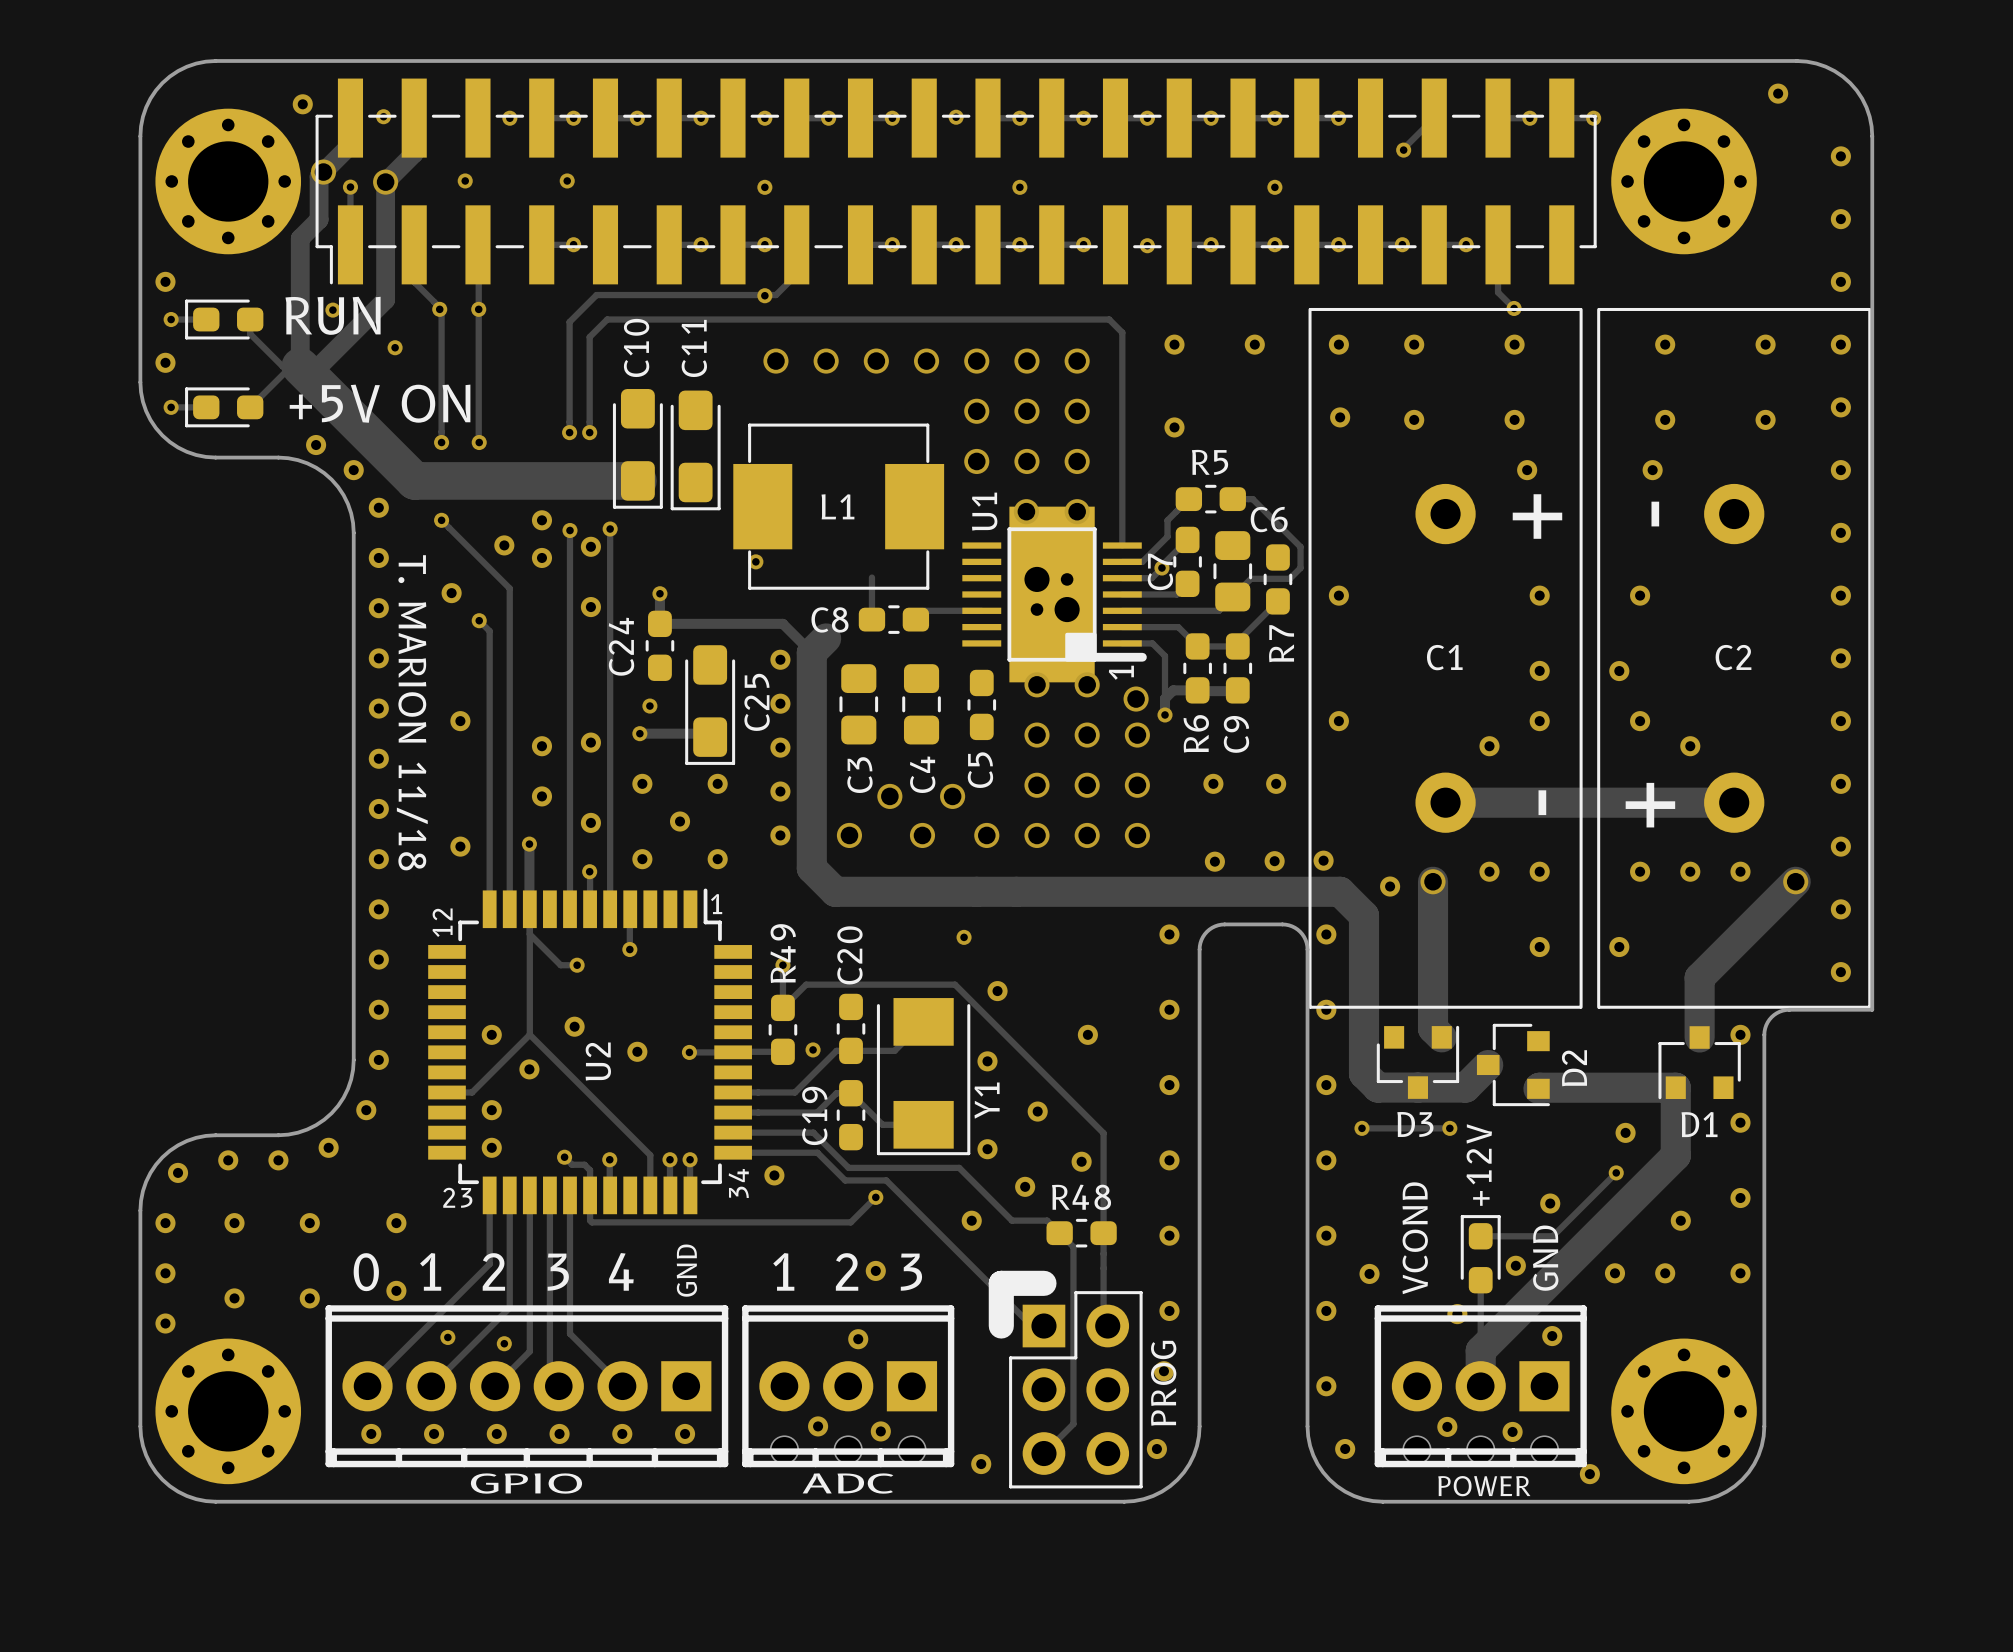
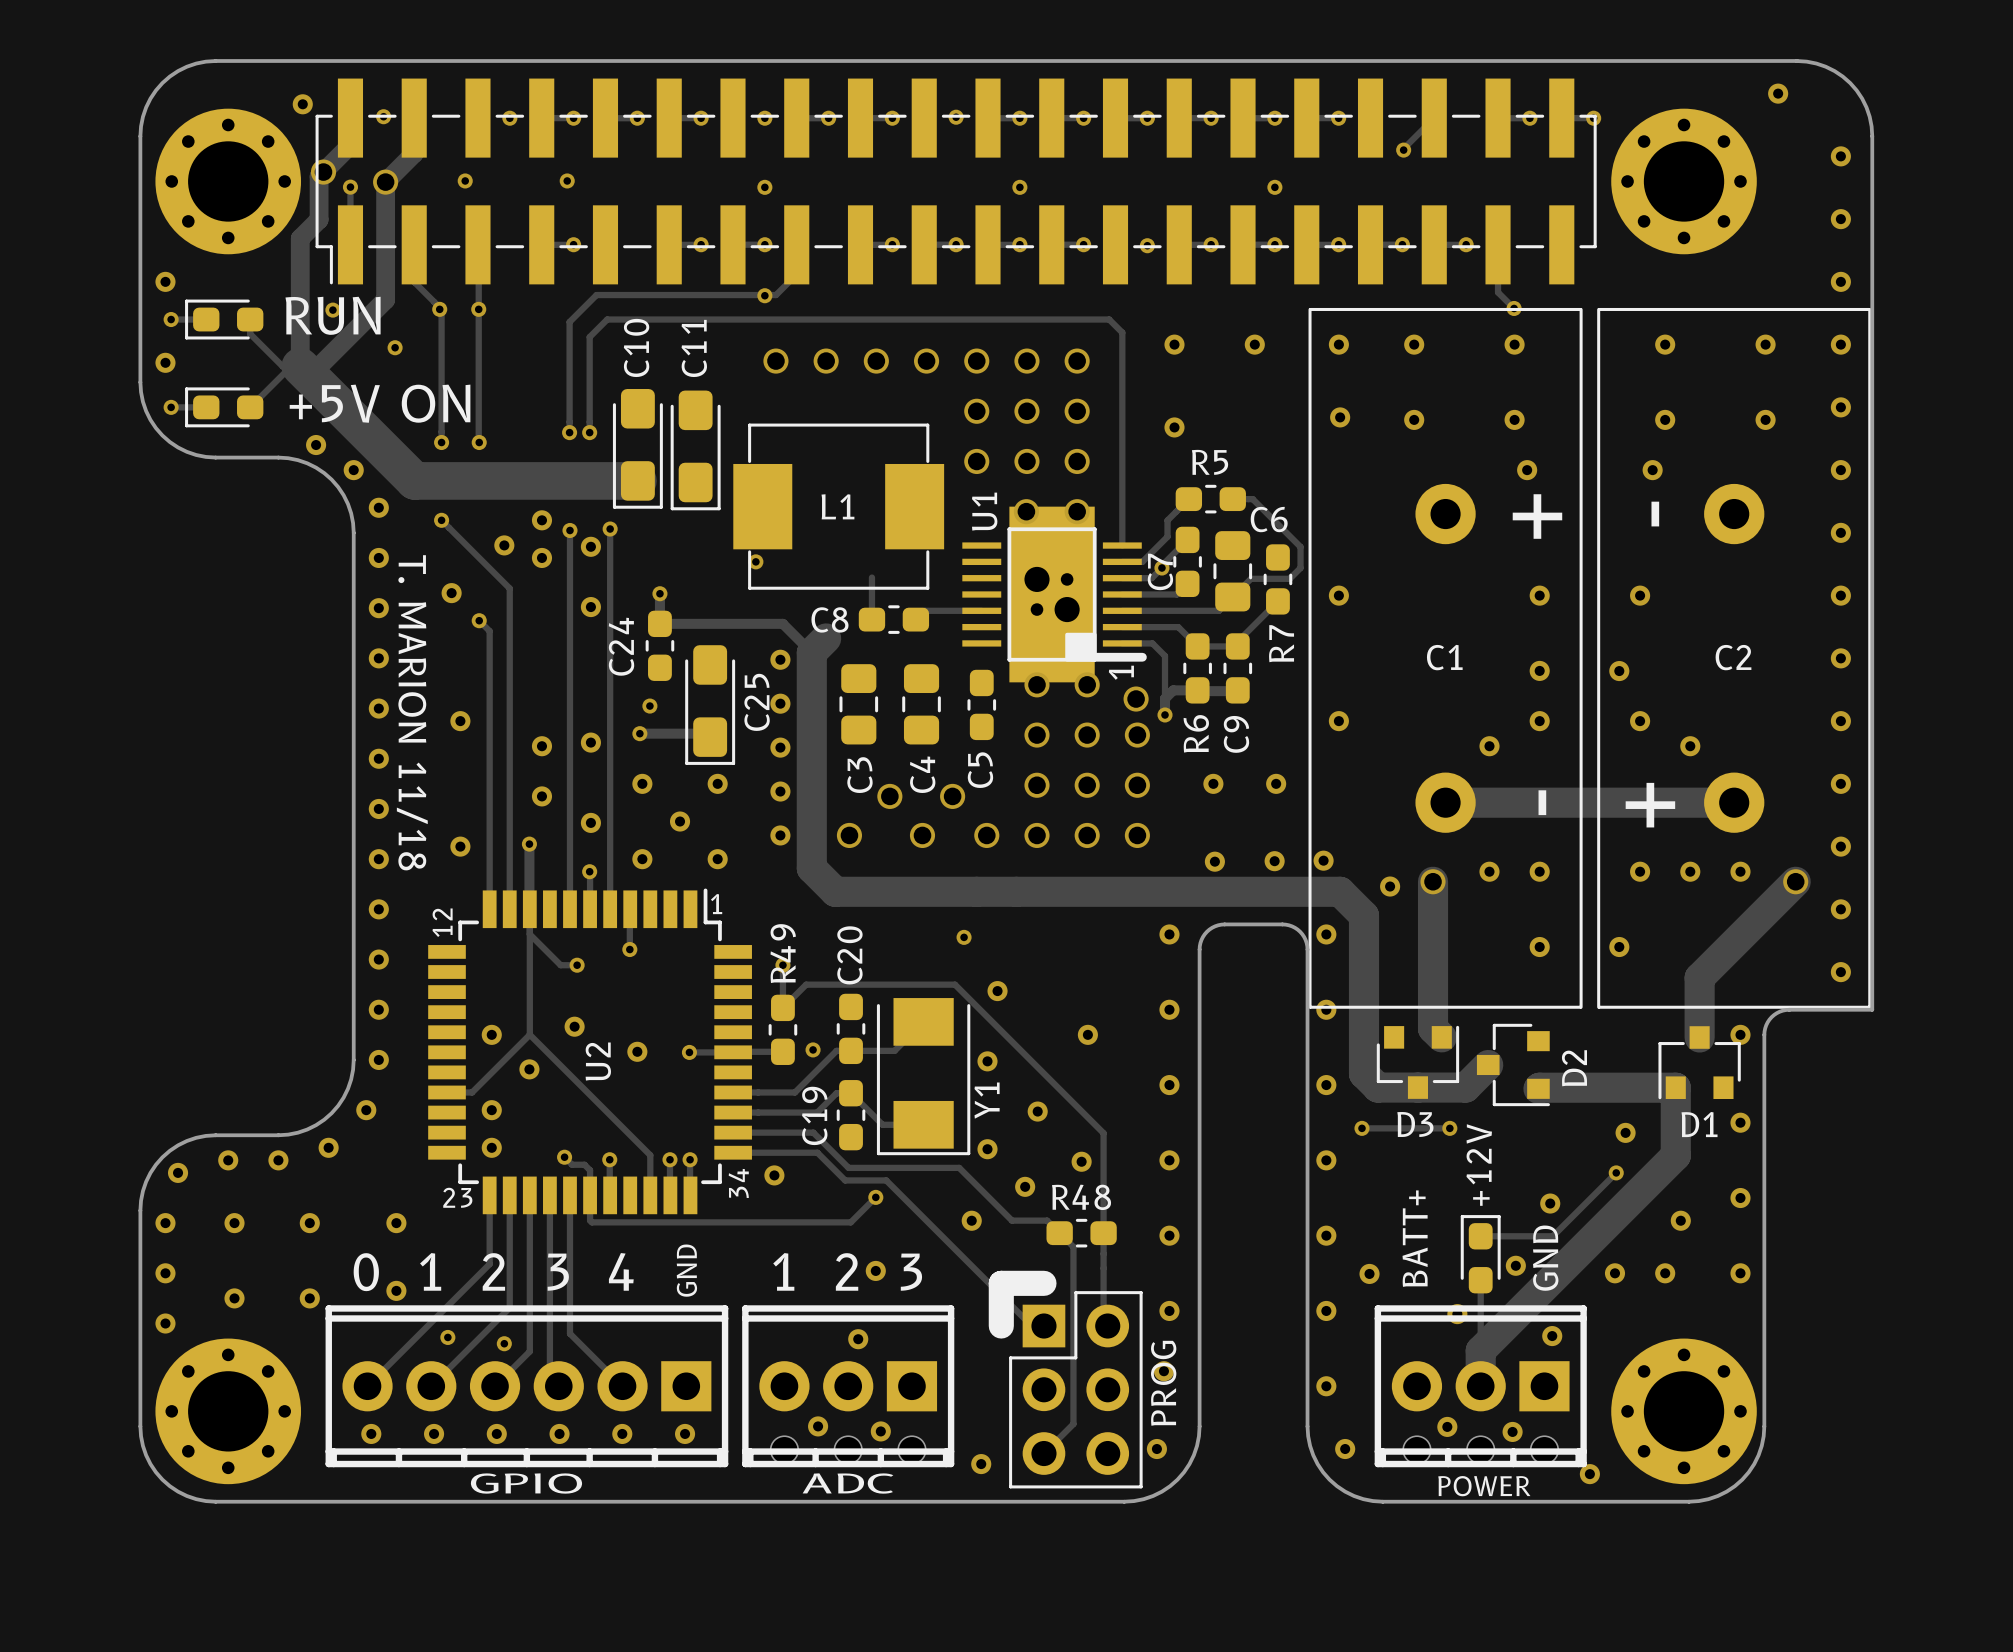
text: VCOND (1415, 1238) -> BATT+ (1415, 1238)

